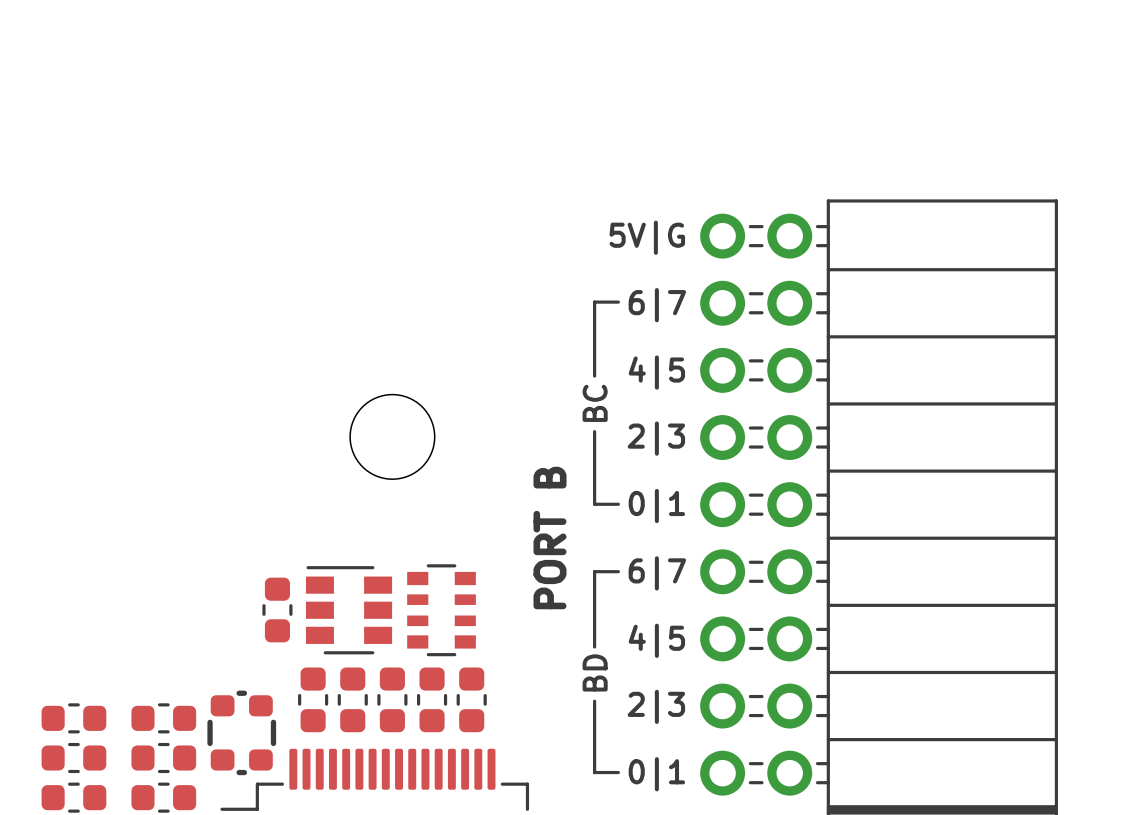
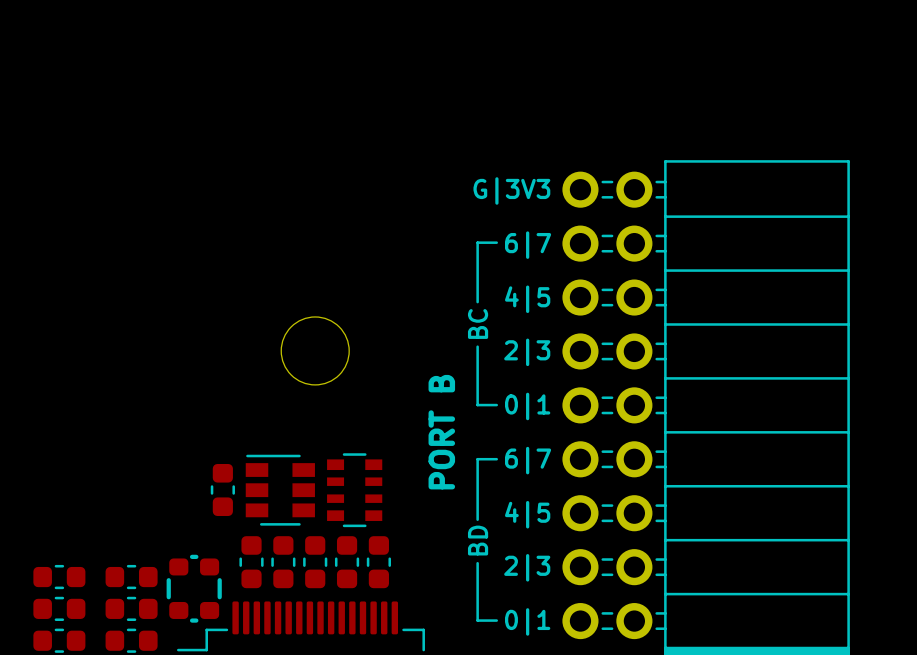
text: 5V|G (647, 237) -> G|3V3 (511, 190)

